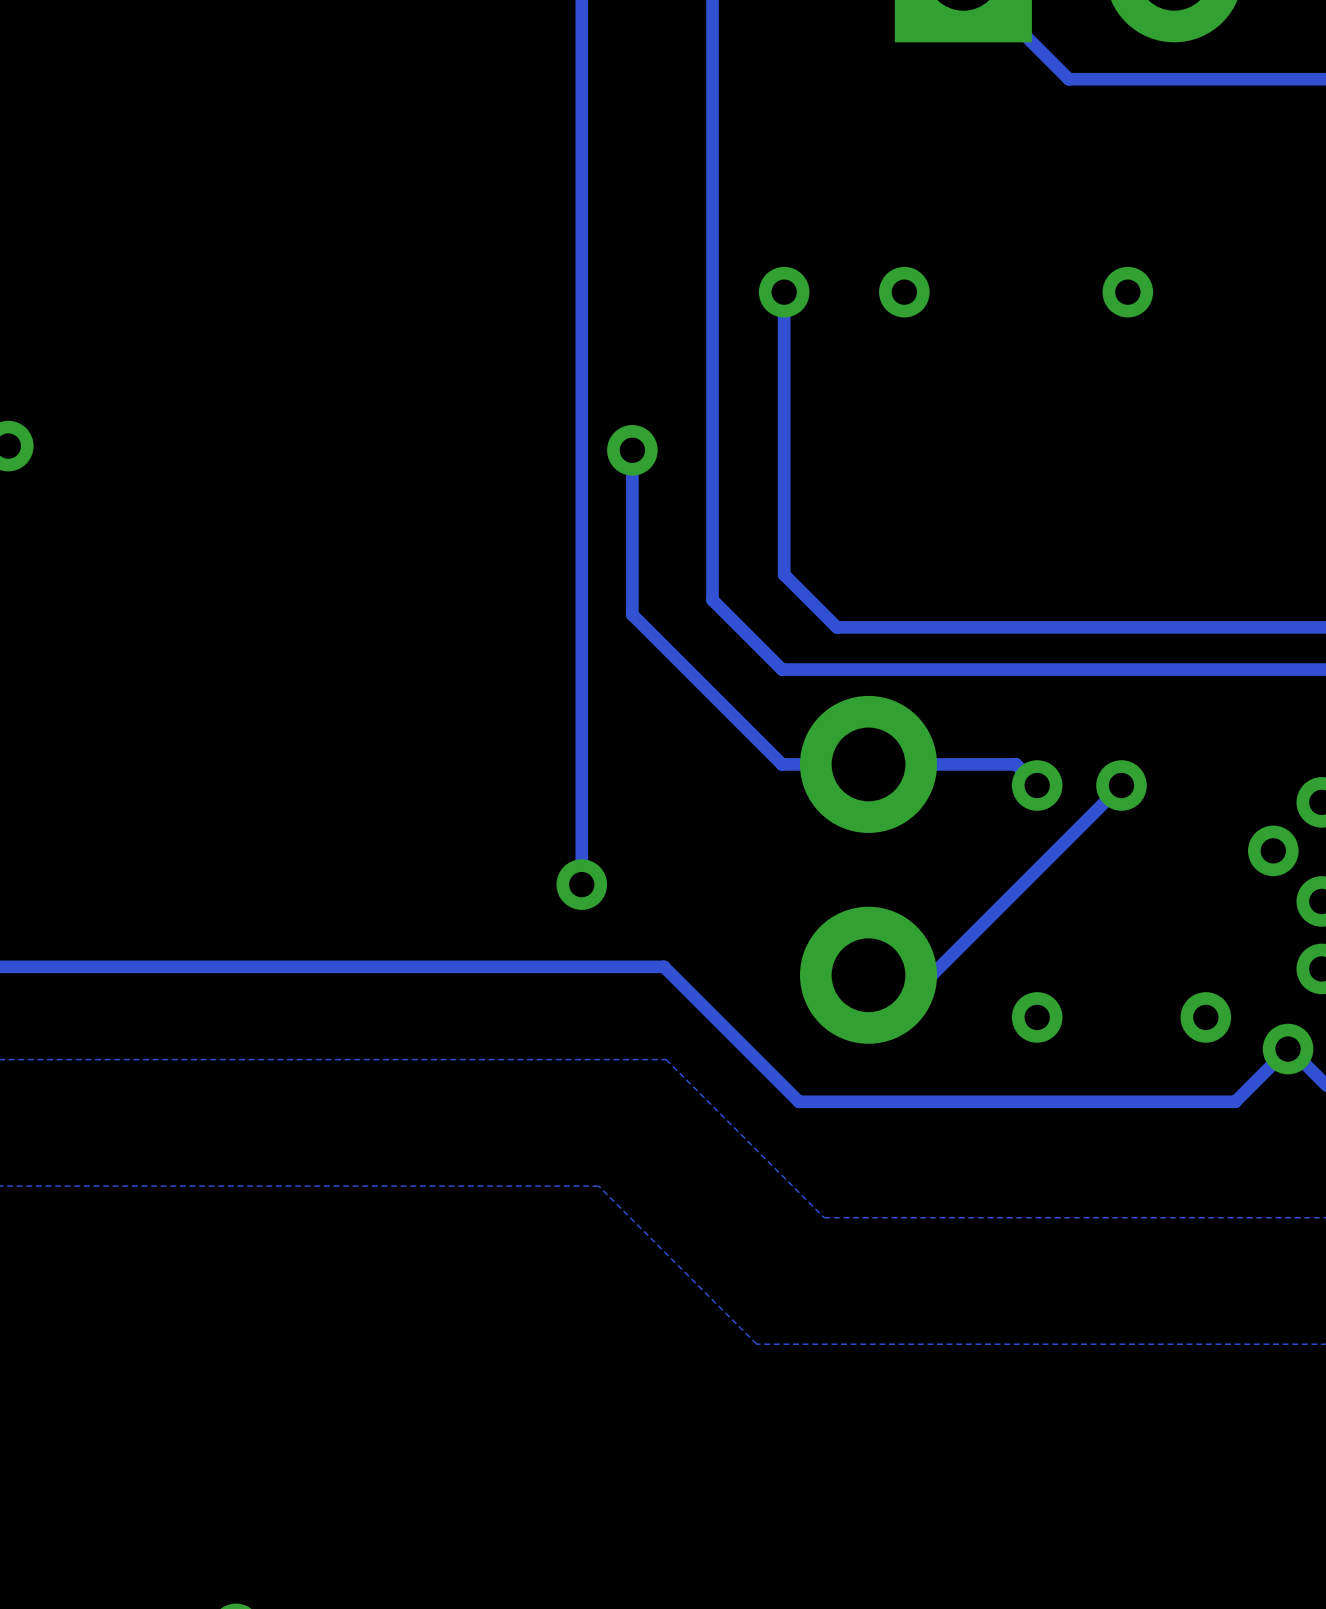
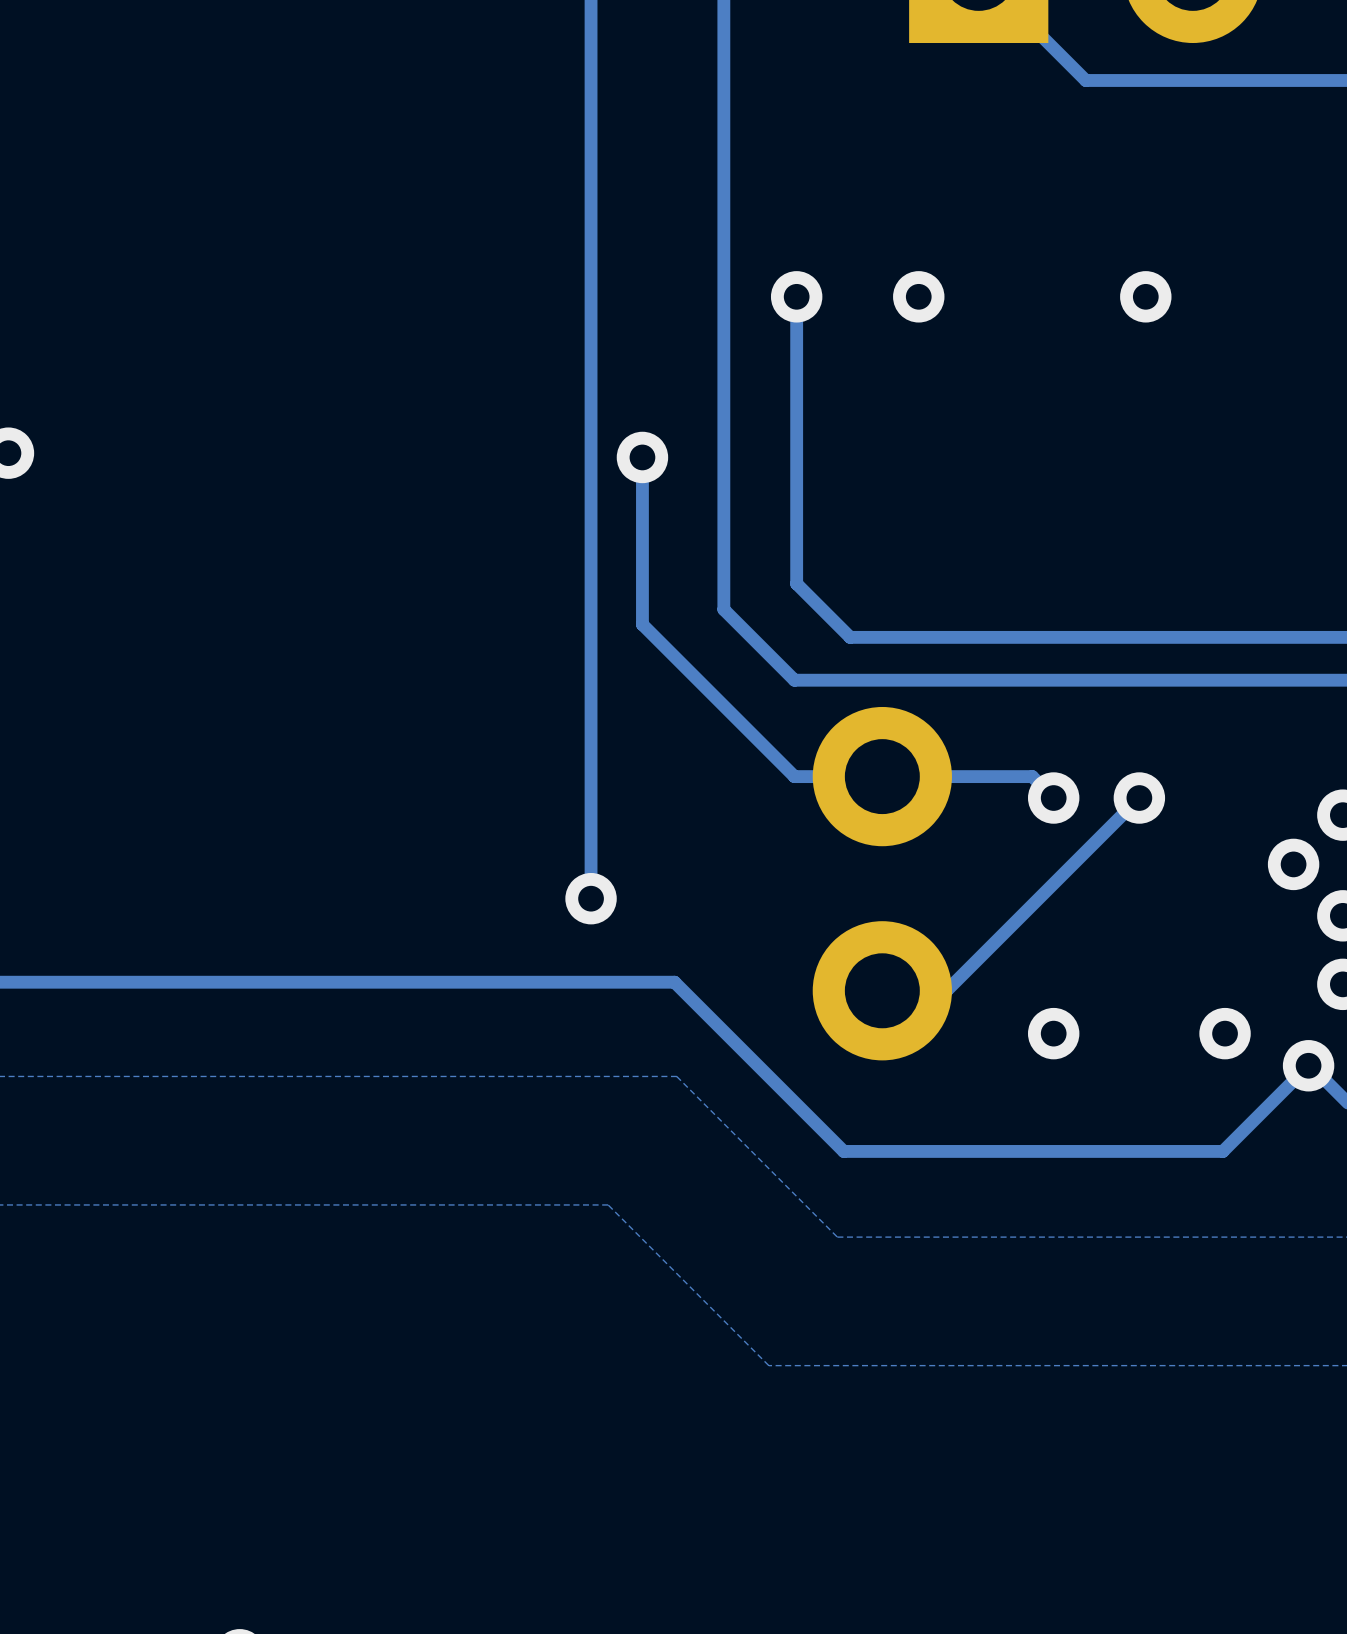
track: (1235, 1101) (798, 1101) -> (1255, 1119) (1222, 1151) (843, 1151) (811, 1119)

